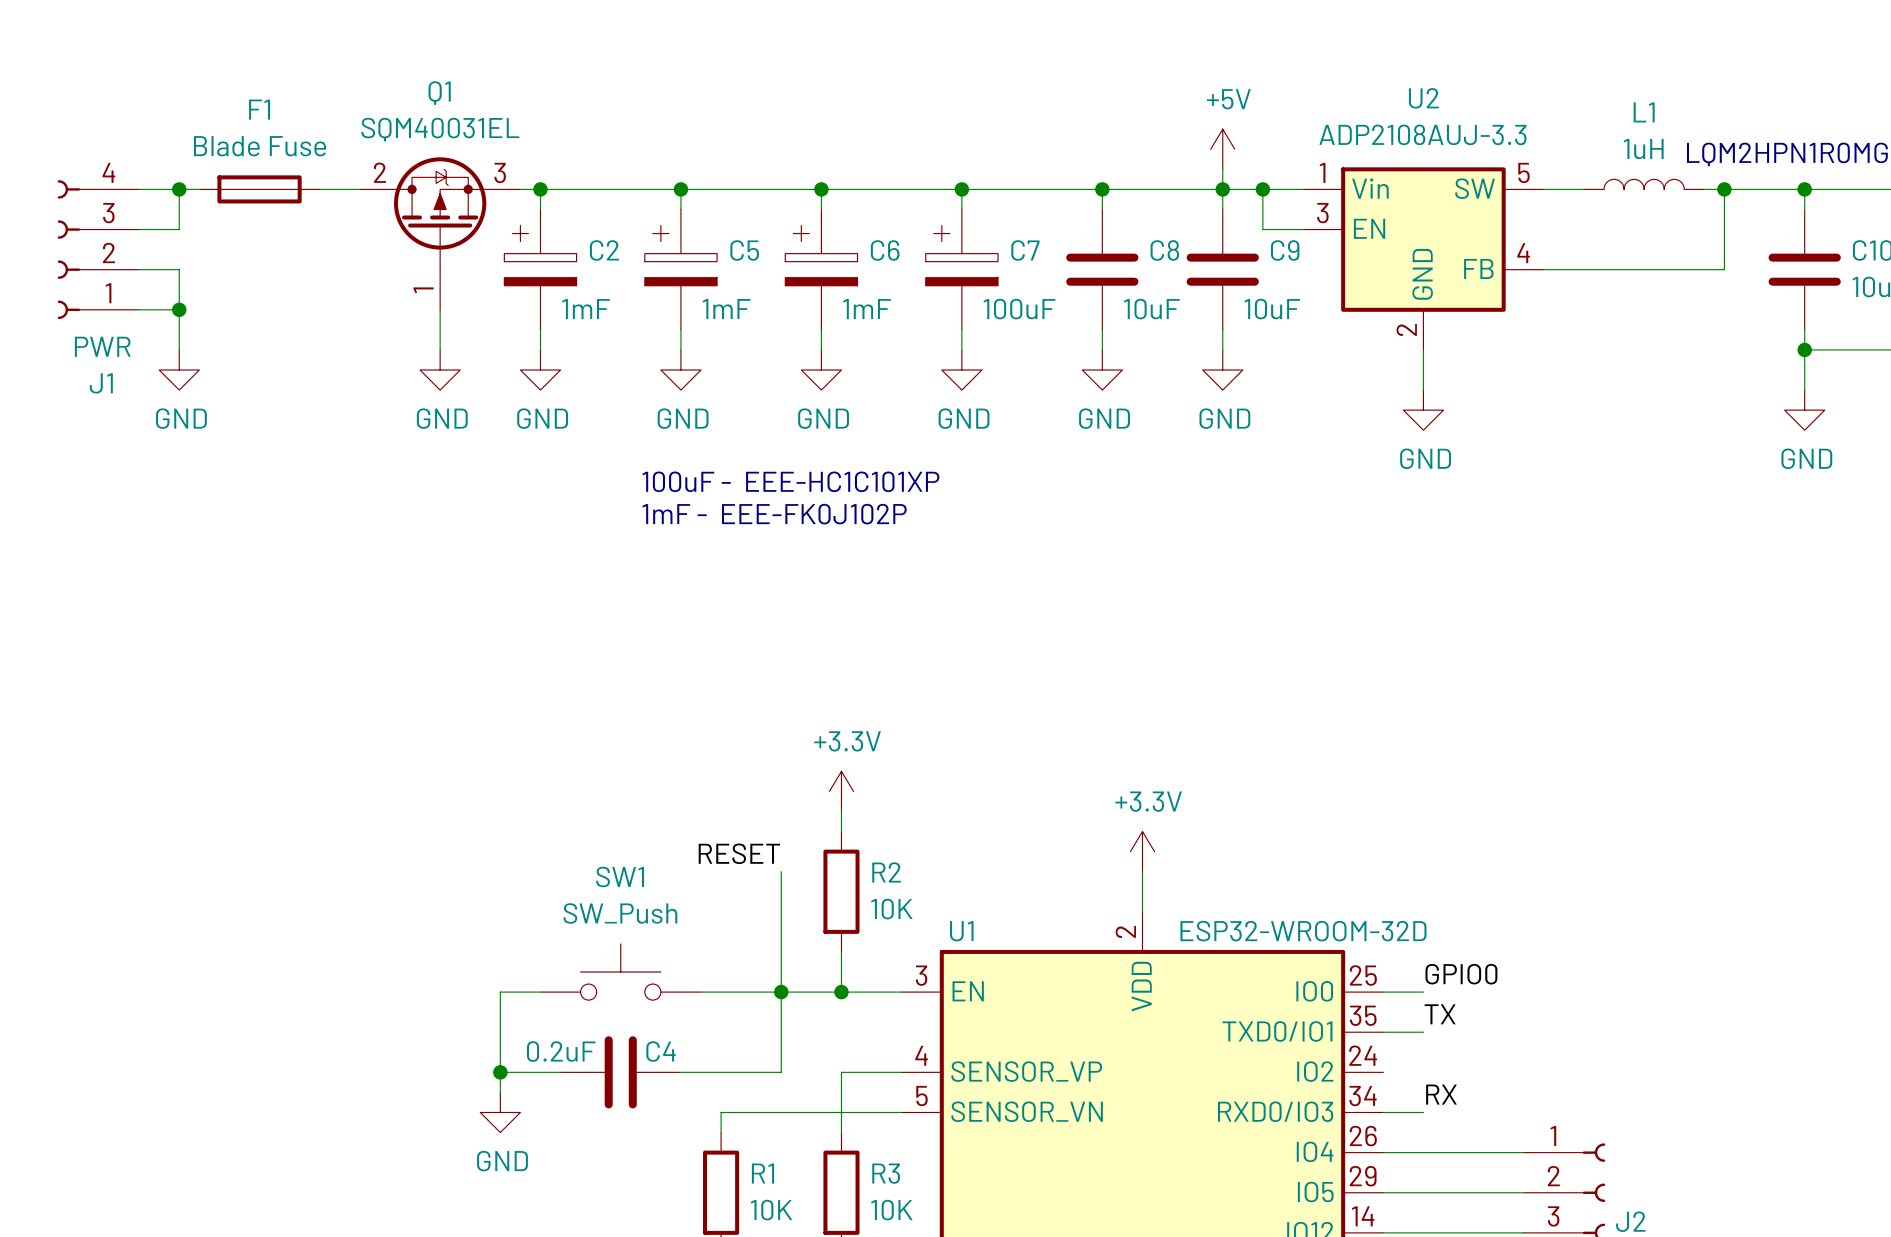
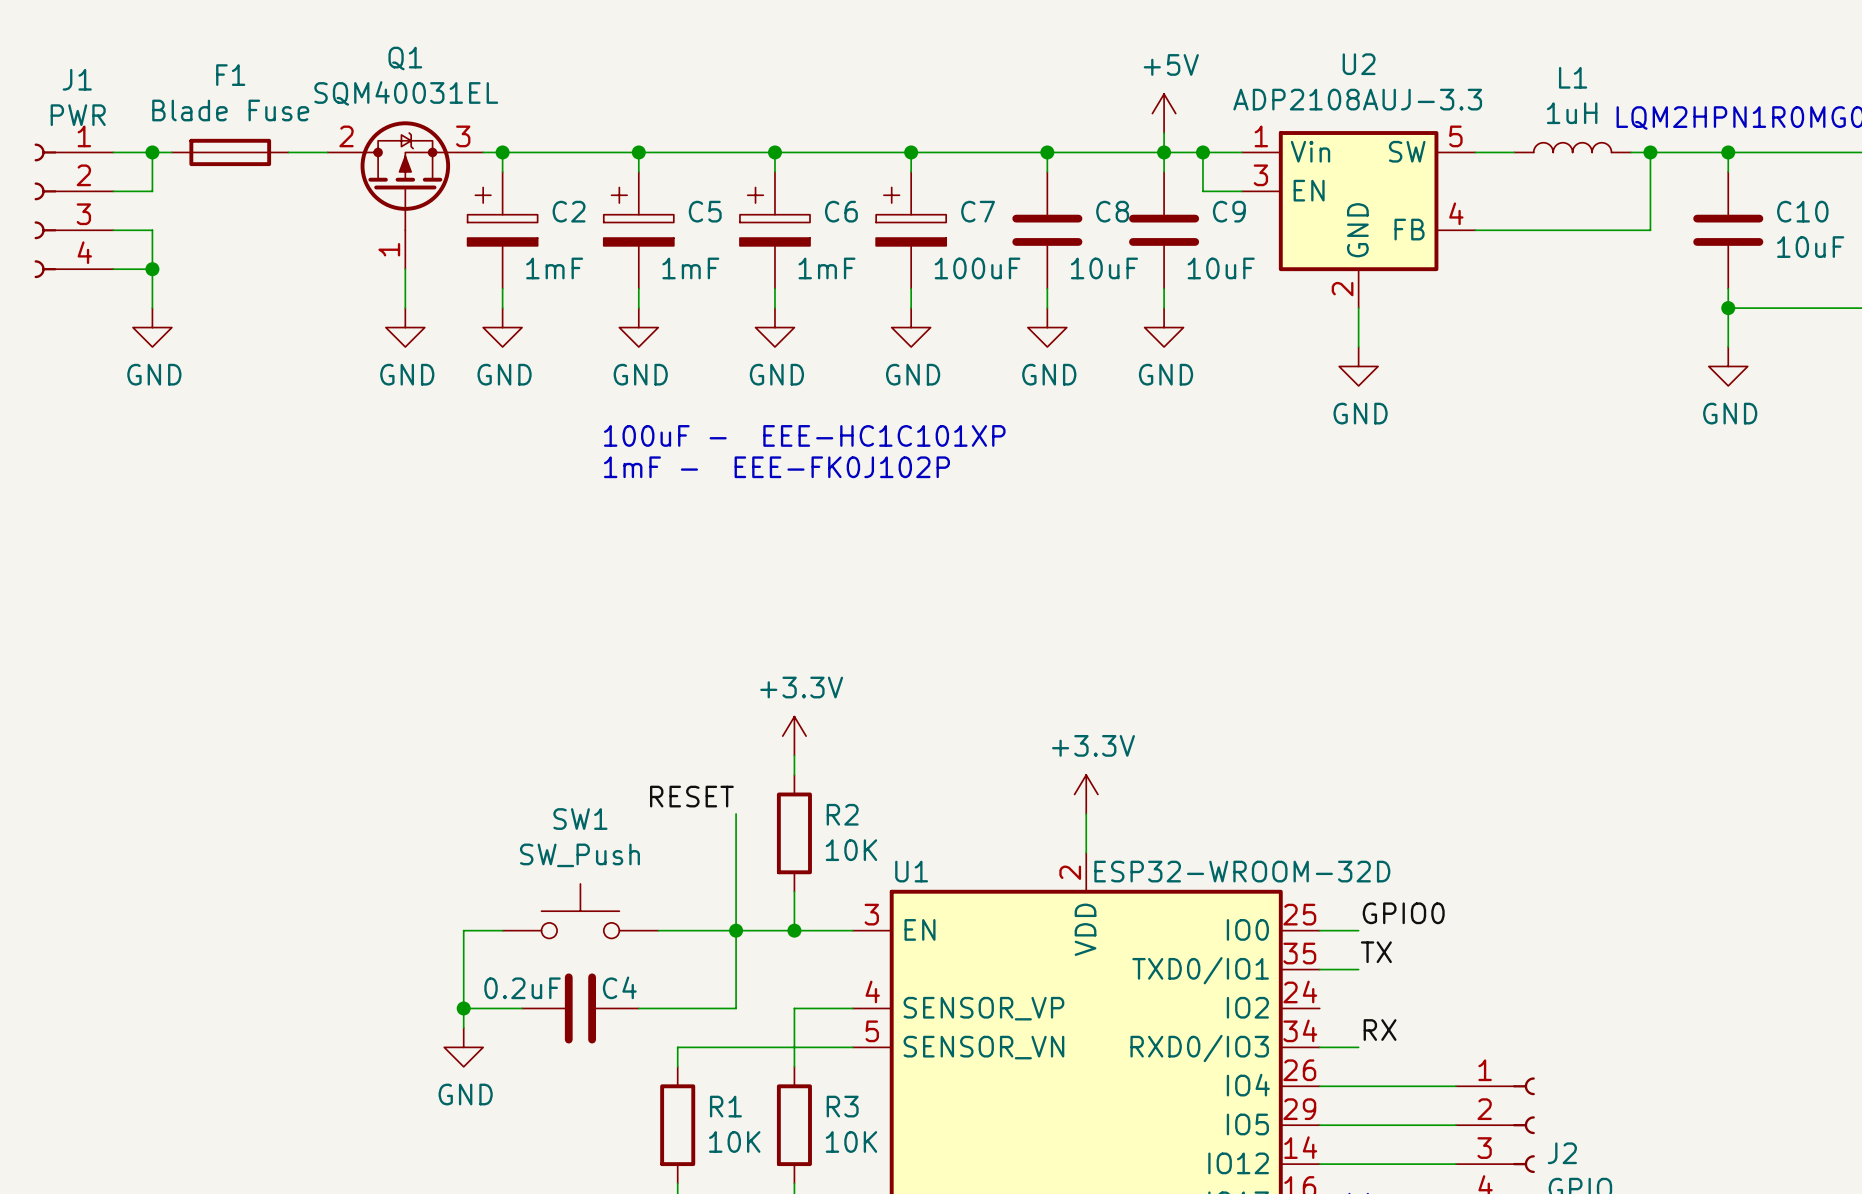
J1 flip: as is (68, 249) -> up-down (45, 210)

